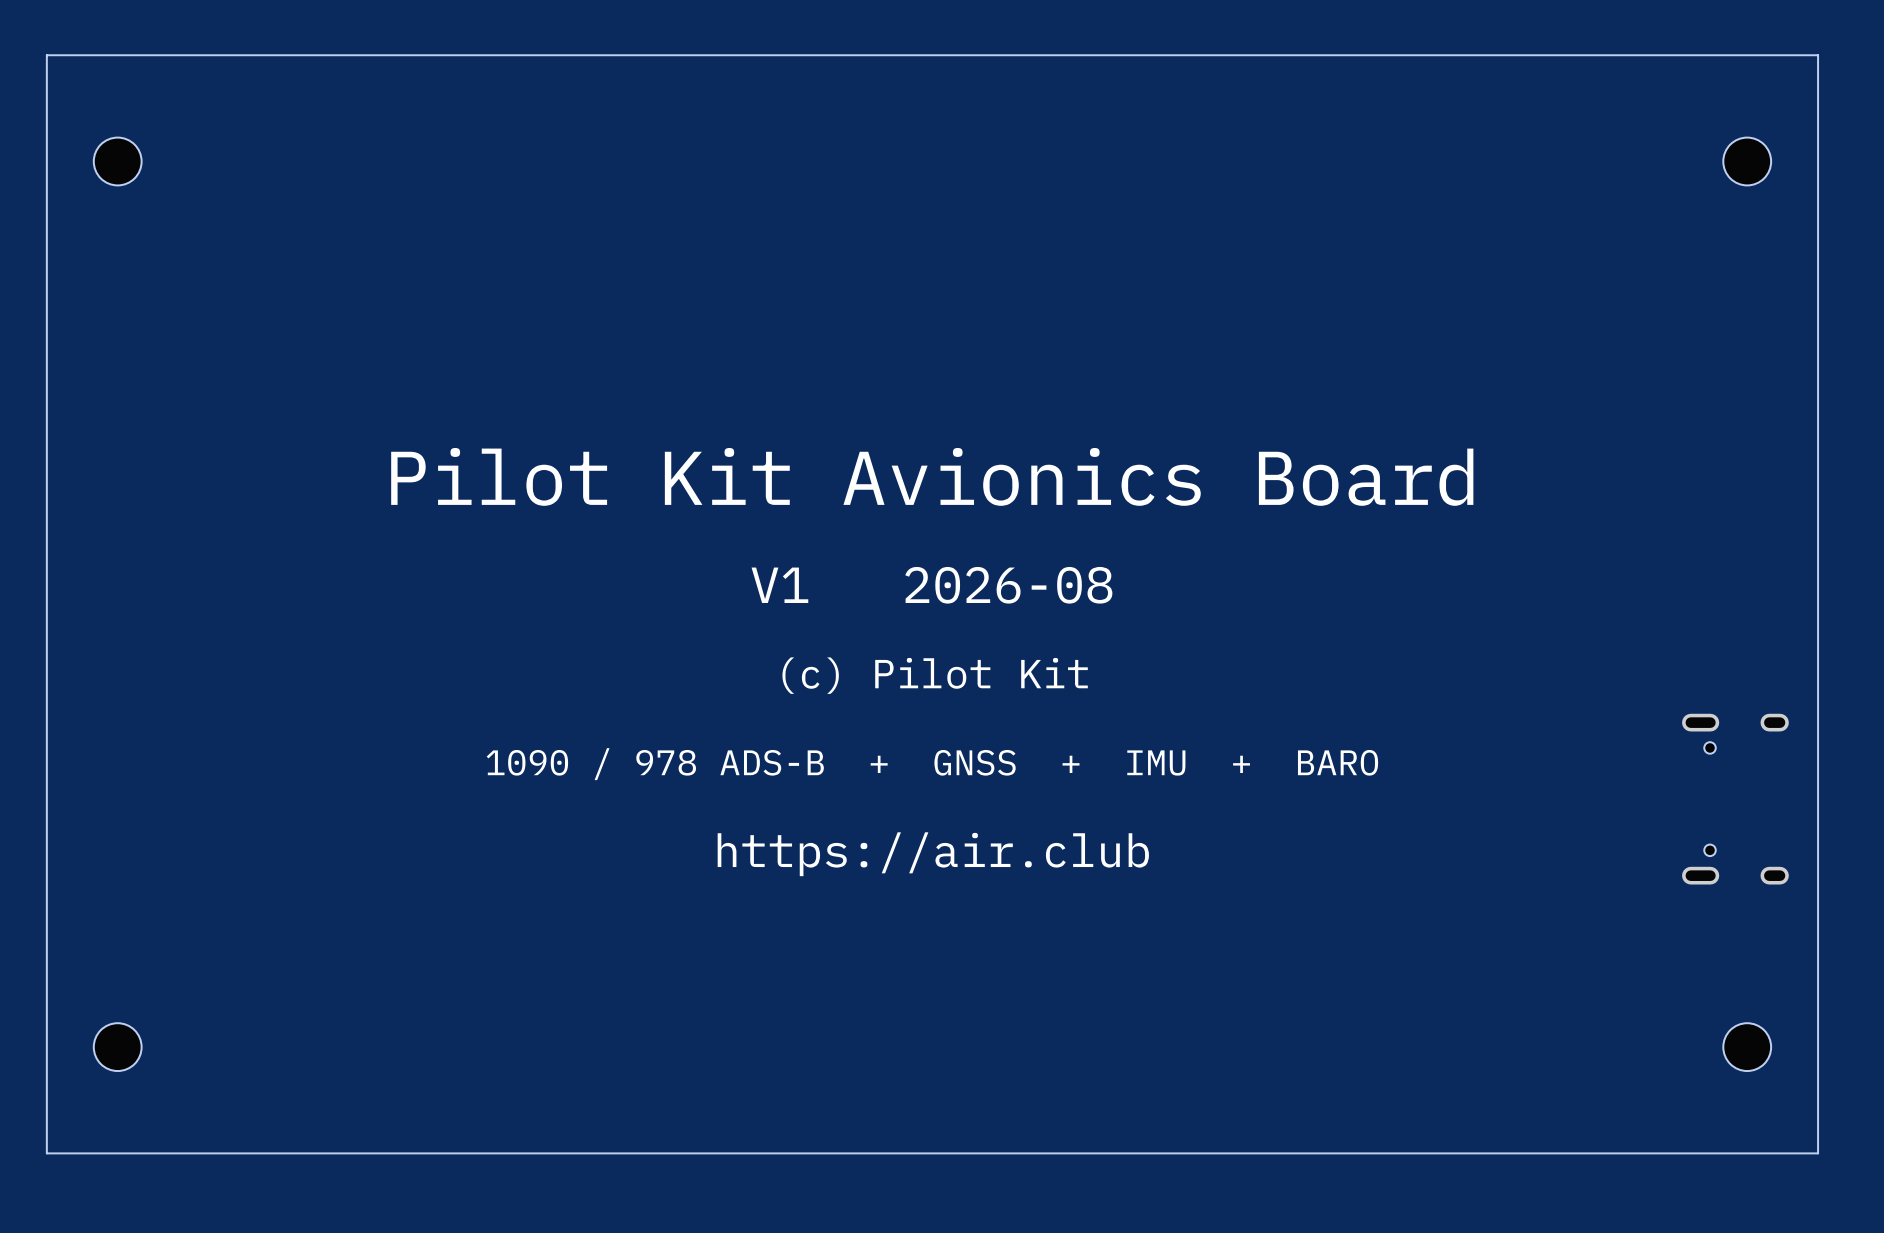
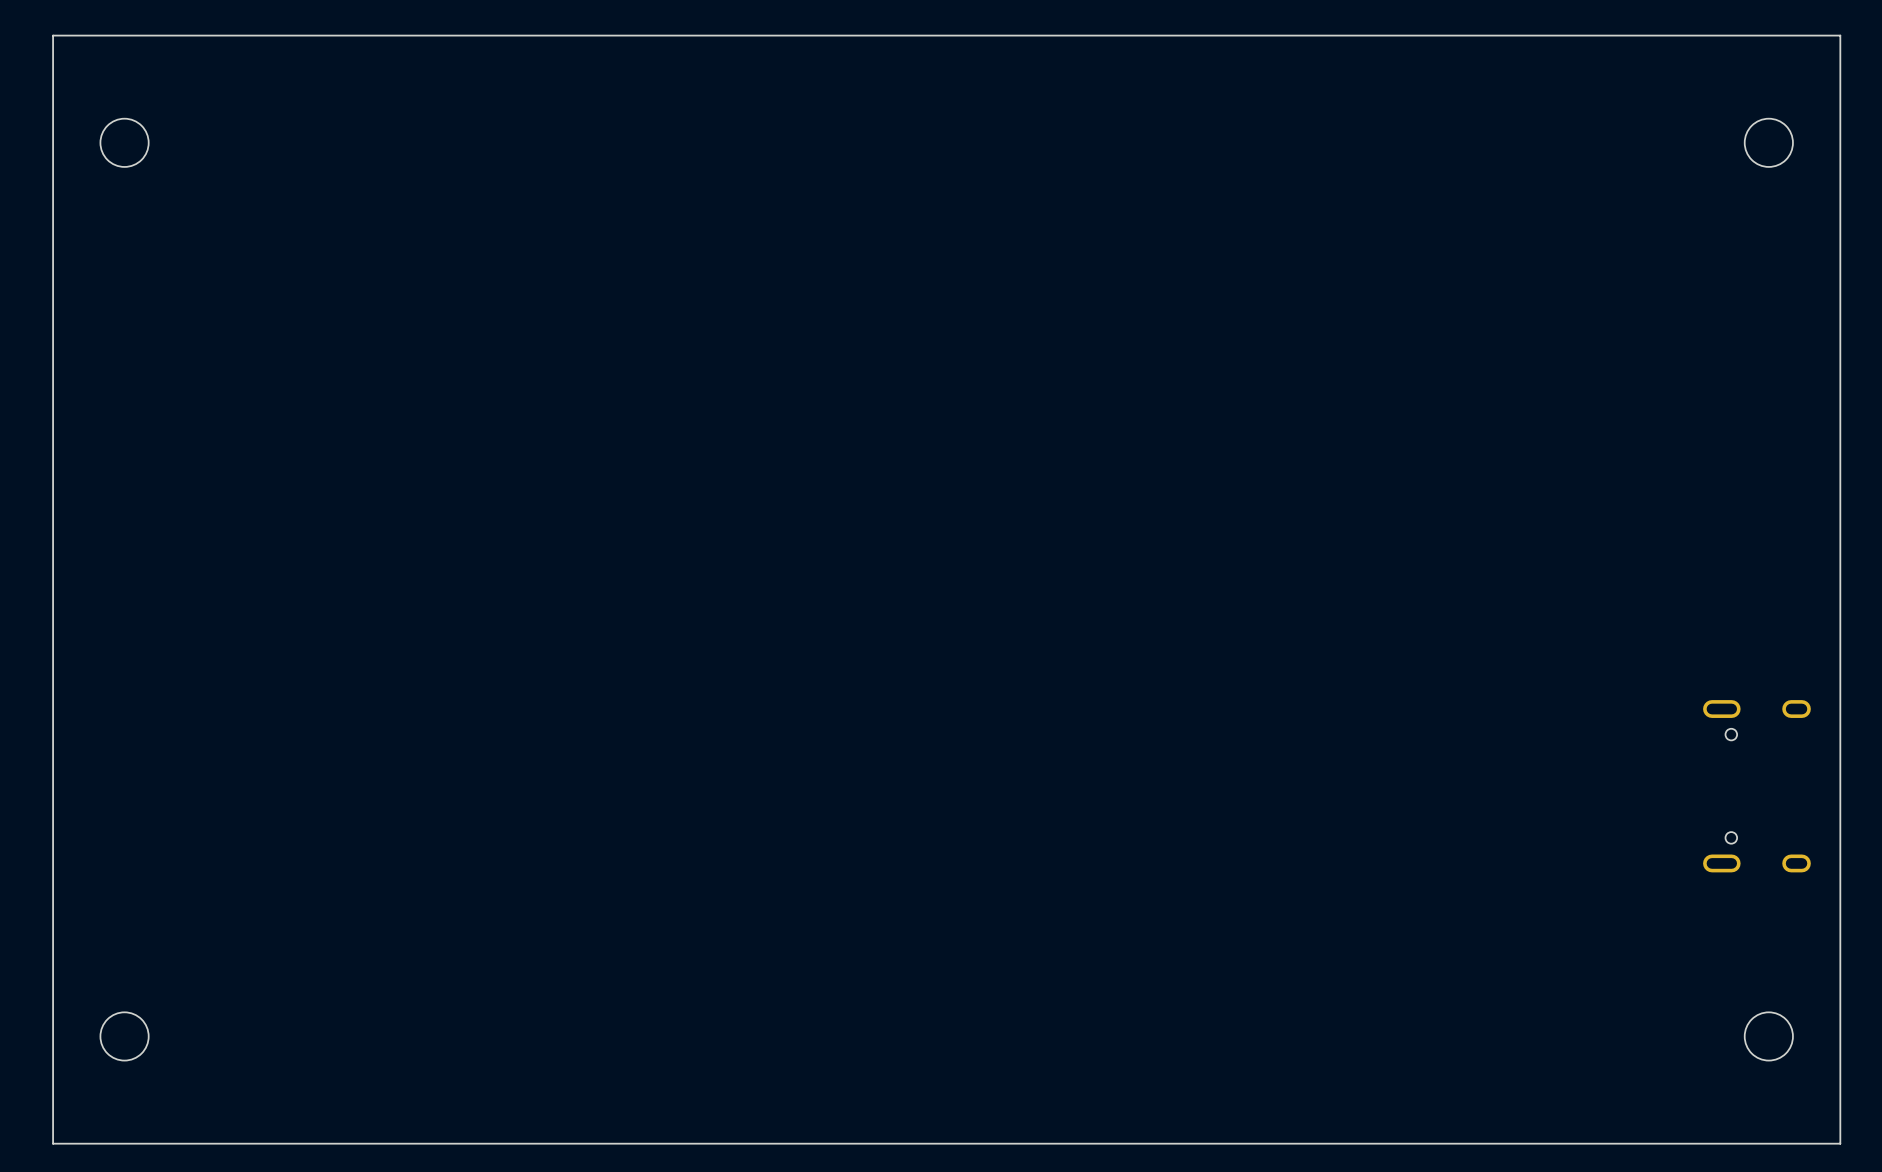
text: Pilot Kit Avionics Board (932, 476) -> none
text: V1 2026-08 (931, 585) -> none
text: (c) Pilot Kit (935, 675) -> none
text: 1090 / 978 ADS-B + GNSS + IMU + BARO (932, 764) -> none
text: https://air.club (933, 854) -> none

